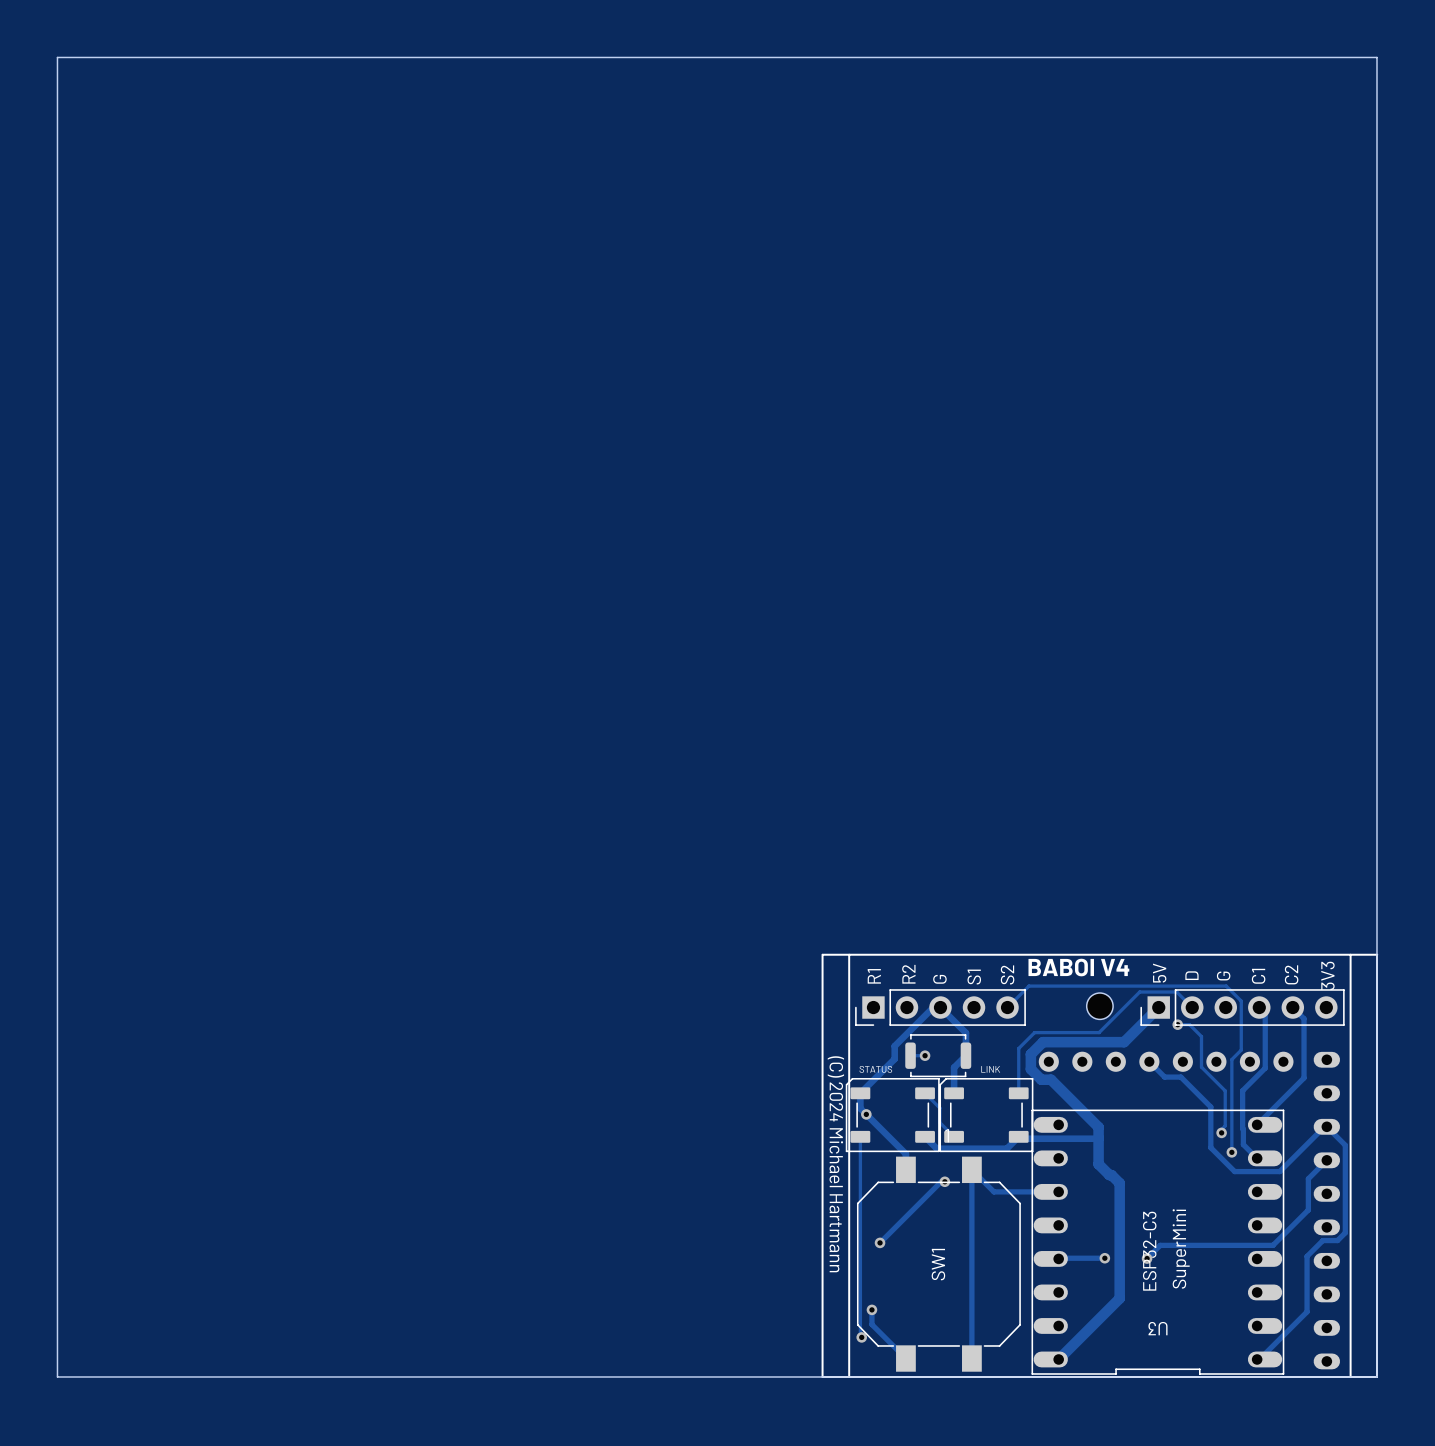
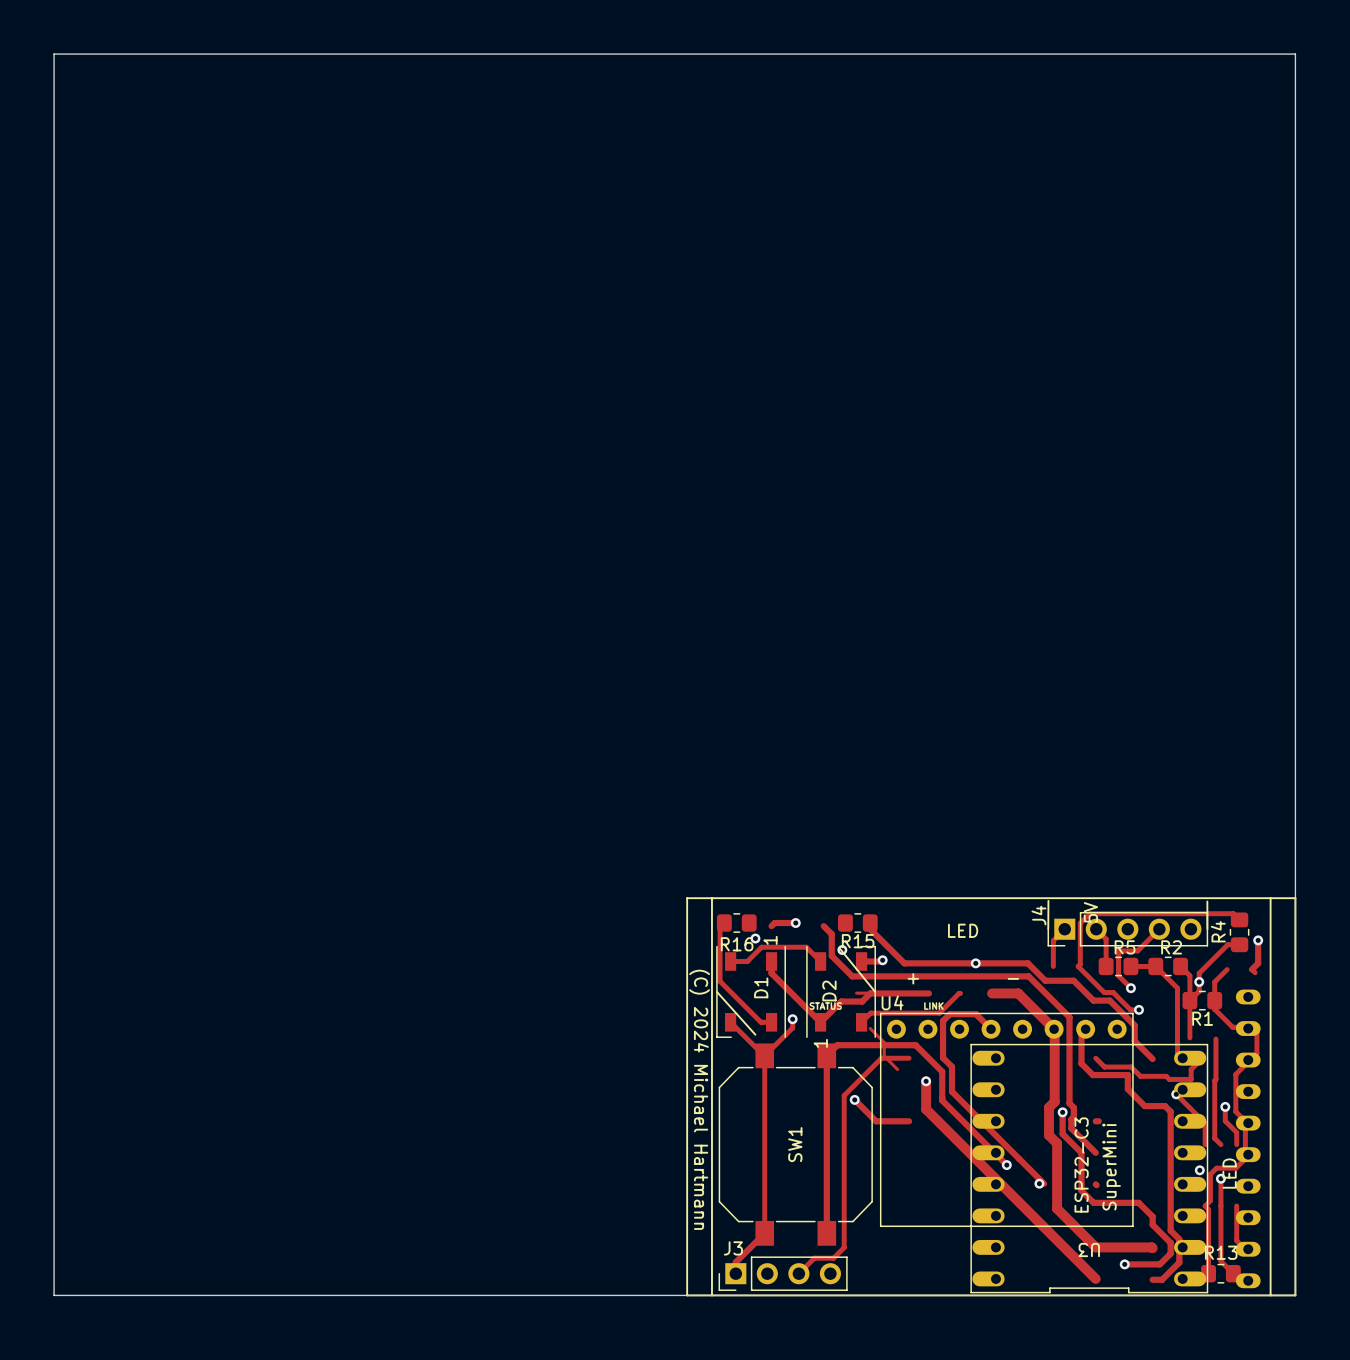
line: (822, 954) (822, 1376) -> (774, 898) (687, 898) (687, 1295) (773, 1295)
line: (849, 954) (849, 1376) -> (711, 898) (711, 1295)
line: none -> (1048, 900) (1048, 929)
line: none -> (1207, 901) (1207, 929)
text: BABOI V4 (1078, 967) -> none
text: R2 (908, 974) -> none
text: S2 (1007, 974) -> none
text: C2 (1291, 974) -> none
text: D (1191, 975) -> none
text: 3V3 (1327, 975) -> none
text: R1 (874, 976) -> none
text: G (1223, 976) -> none
text: C1 (1258, 976) -> none
text: S1 (974, 977) -> none
track: none -> (1239, 919) (1233, 913) (1089, 913) (1080, 923) (1080, 964) (1078, 966) (1104, 992) (1113, 992) (1130, 1009) (1139, 1009)
text: G (939, 979) -> none
track: none -> (724, 923) (720, 927) (720, 981) (761, 1022) (771, 1022)
R16: none -> (736, 923)
track: none -> (795, 923) (774, 923) (771, 926)
via: none -> (795, 923)
R15: none -> (857, 923)
track: none -> (823, 926) (831, 934) (831, 955) (852, 976) (1028, 976) (1069, 1017) (1069, 1103) (1073, 1107) (1071, 1128) (1095, 1152)
track: none -> (870, 929) (904, 963) (1027, 963) (1045, 980) (1073, 980) (1093, 1000) (1109, 1000) (1134, 1025) (1134, 1041) (1152, 1059)
track: none -> (1064, 929) (1053, 940) (1053, 966)
track: none -> (1096, 929) (1106, 939) (1106, 966)
J4: none -> (1127, 929)
track: none -> (1155, 929) (1159, 929) (1137, 950) (1118, 950) (1118, 975) (1130, 988)
text: none -> LED (963, 930)
R4: none -> (1239, 932)
via: none -> (755, 938)
track: none -> (1258, 940) (1258, 963) (1251, 969) (1255, 972)
via: none -> (1258, 940)
track: none -> (1239, 944) (1227, 944) (1199, 973) (1199, 991) (1189, 1000)
part: (1099, 1006) -> none
line: none -> (839, 947) (875, 991)
part: (940, 1007) -> none
track: (1007, 1007) (1028, 986) (1226, 986) (1241, 1001) (1241, 1050) (1231, 1059) (1231, 1152) -> none
track: (1158, 1007) (1124, 1042) (1043, 1042) (1030, 1054) (1030, 1069) (1041, 1079) (1051, 1079) (1098, 1127) (1098, 1164) (1119, 1183) (1119, 1298) (1058, 1359) -> none
track: (1192, 1007) (1176, 992) (1139, 992) (1099, 1032) (1034, 1032) (1018, 1048) (1018, 1093) -> none
part: (1242, 1007) -> none
track: (1292, 1007) (1304, 1018) (1304, 1077) (1257, 1124) -> none
via: none -> (842, 950)
track: (1265, 1013) (1265, 1068) (1242, 1090) (1243, 1144) (1257, 1158) -> none
track: none -> (882, 960) (861, 961)
via: none -> (882, 960)
track: none -> (730, 961) (747, 961) (761, 947) (806, 947) (820, 961)
track: none -> (771, 961) (771, 973) (820, 1022) (841, 1001) (862, 1001) (870, 993) (928, 993)
via: none -> (975, 963)
track: (1177, 1024) (1189, 1024) (1201, 1036) (1201, 1067) (1225, 1090) (1225, 1125) (1221, 1129) (1221, 1132) -> none
via: (1177, 1024) -> none
R5: none -> (1118, 966)
track: none -> (1130, 966) (1155, 966) (1177, 988) (1177, 1054) (1180, 1057)
R2: none -> (1168, 966)
track: none -> (1180, 966) (1189, 975) (1189, 1037)
track: none -> (1227, 969) (1214, 981) (1214, 1009) (1232, 1027) (1252, 1027) (1256, 1031) (1256, 1053) (1235, 1074) (1235, 1111) (1245, 1121) (1245, 1158) (1235, 1168) (1216, 1168) (1210, 1174) (1210, 1200) (1205, 1206) (1208, 1209) (1208, 1273)
text: none -> + (913, 978)
text: none -> - (1013, 978)
via: none -> (1199, 981)
via: none -> (1130, 988)
line: none -> (716, 991) (755, 1034)
D1: none -> (751, 991)
D2: none -> (841, 991)
via: (925, 1055) -> none
part: (938, 1055) -> none
track: none -> (960, 993) (939, 1013) (870, 1013) (861, 1022)
track: none -> (992, 993) (1018, 993) (1054, 1029) (1054, 1101) (1049, 1107) (1049, 1135) (1057, 1143) (1057, 1208) (1095, 1247) (1152, 1248)
track: (1149, 1061) (1164, 1077) (1180, 1077) (1210, 1107) (1210, 1147) (1234, 1171) (1279, 1171) (1324, 1126) (1326, 1126) (1345, 1145) (1345, 1232) (1337, 1240) (1322, 1240) (1307, 1256) (1307, 1311) (1259, 1359) (1257, 1359) -> none
U4 side: bottom (1166, 1061) -> top (1006, 1119)
R1: none -> (1202, 1000)
via: none -> (1139, 1009)
track: none -> (792, 1019) (792, 1027) (764, 1055)
via: none -> (792, 1019)
track: none -> (730, 1022) (764, 1055)
track: (954, 1093) (954, 1067) (965, 1055) (965, 1032) (940, 1007) (933, 1007) (894, 1046) (894, 1058) (860, 1093) (860, 1108) (905, 1153) (905, 1169) -> none
track: none -> (991, 1029) (976, 1014) (949, 1014) (943, 1020) (943, 1057) (952, 1066) (952, 1091) (1044, 1183)
track: none -> (1085, 1029) (1081, 1033) (1081, 1063) (1092, 1075) (1127, 1075) (1127, 1089) (1144, 1106) (1165, 1106) (1170, 1111) (1170, 1230) (1179, 1239) (1179, 1262) (1162, 1279) (1152, 1279)
track: none -> (1215, 1039) (1214, 1138) (1220, 1144)
via: (866, 1114) -> none
part: (892, 1115) -> none
part: (986, 1115) -> none
track: none -> (764, 1055) (764, 1233) (735, 1262) (735, 1273)
track: none -> (1203, 1057) (1191, 1069) (1191, 1079) (1169, 1079) (1166, 1076) (1140, 1076) (1131, 1067) (1104, 1067) (1095, 1058)
track: none -> (909, 1058) (881, 1058) (844, 1095) (844, 1247) (833, 1258) (814, 1258) (798, 1273)
via: (1221, 1132) -> none
track: (860, 1136) (861, 1337) -> none
track: (925, 1136) (936, 1148) (1006, 1148) (1018, 1136) (1022, 1138) (1098, 1138) -> none
track: none -> (926, 1081) (926, 1109) (1095, 1278)
via: none -> (926, 1081)
via: (1231, 1152) -> none
track: (1326, 1160) (1308, 1178) (1308, 1209) (1273, 1245) (1160, 1245) (1147, 1258) -> none
track: none -> (1176, 1094) (1205, 1123) (1205, 1144)
via: none -> (1176, 1094)
text position: (C) 2024 Michael Hartmann (835, 1164) -> (C) 2024 Michael Hartmann (699, 1099)
track: none -> (854, 1099) (876, 1121) (909, 1121)
via: none -> (854, 1099)
track: none -> (1225, 1106) (1225, 1121) (1236, 1132) (1236, 1144)
via: none -> (1225, 1106)
track: (944, 1181) (941, 1181) (880, 1242) -> none
via: (944, 1181) -> none
track: none -> (1062, 1112) (1062, 1134) (1081, 1152) (1081, 1190) (1093, 1202) (1138, 1202) (1152, 1216) (1152, 1224) (1170, 1242) (1170, 1253) (1159, 1264) (1124, 1264)
via: none -> (1062, 1112)
track: (1058, 1191) (993, 1191) (971, 1169) (971, 1358) -> none
track: none -> (1095, 1121) (1098, 1121)
track: none -> (1006, 1165) (942, 1100) (942, 1071) (915, 1045) (837, 1045) (826, 1055) (826, 1233)
via: none -> (1006, 1165)
via: (880, 1242) -> none
via: none -> (1199, 1170)
text: none -> LED (1229, 1173)
track: none -> (1220, 1178) (1220, 1261) (1233, 1273)
via: none -> (1220, 1178)
track: (1104, 1258) (1058, 1258) -> none
via: (1147, 1258) -> none
track: none -> (1095, 1184) (1096, 1185)
SW1 position: (938, 1264) -> (795, 1144)
track: none -> (1236, 1206) (1236, 1240) (1241, 1245)
track: (871, 1309) (871, 1324) (905, 1358) -> none
via: (871, 1309) -> none
via: (861, 1337) -> none
via: none -> (1124, 1264)
J3: none -> (783, 1273)
R13: none -> (1220, 1273)

